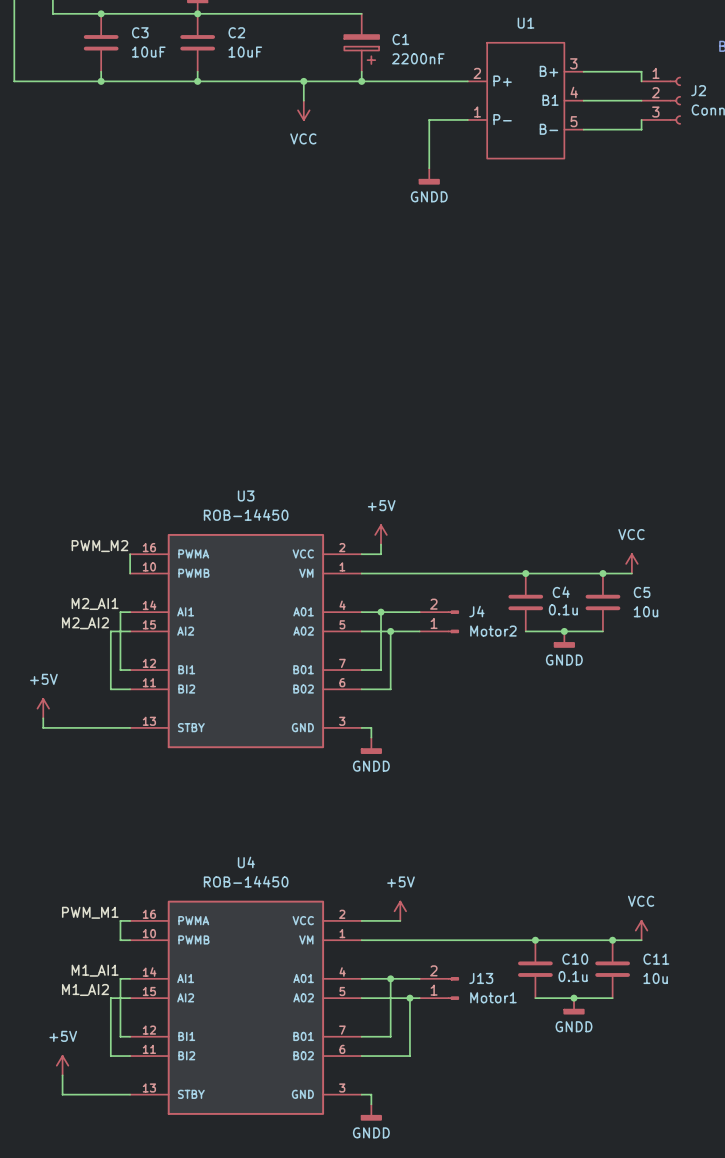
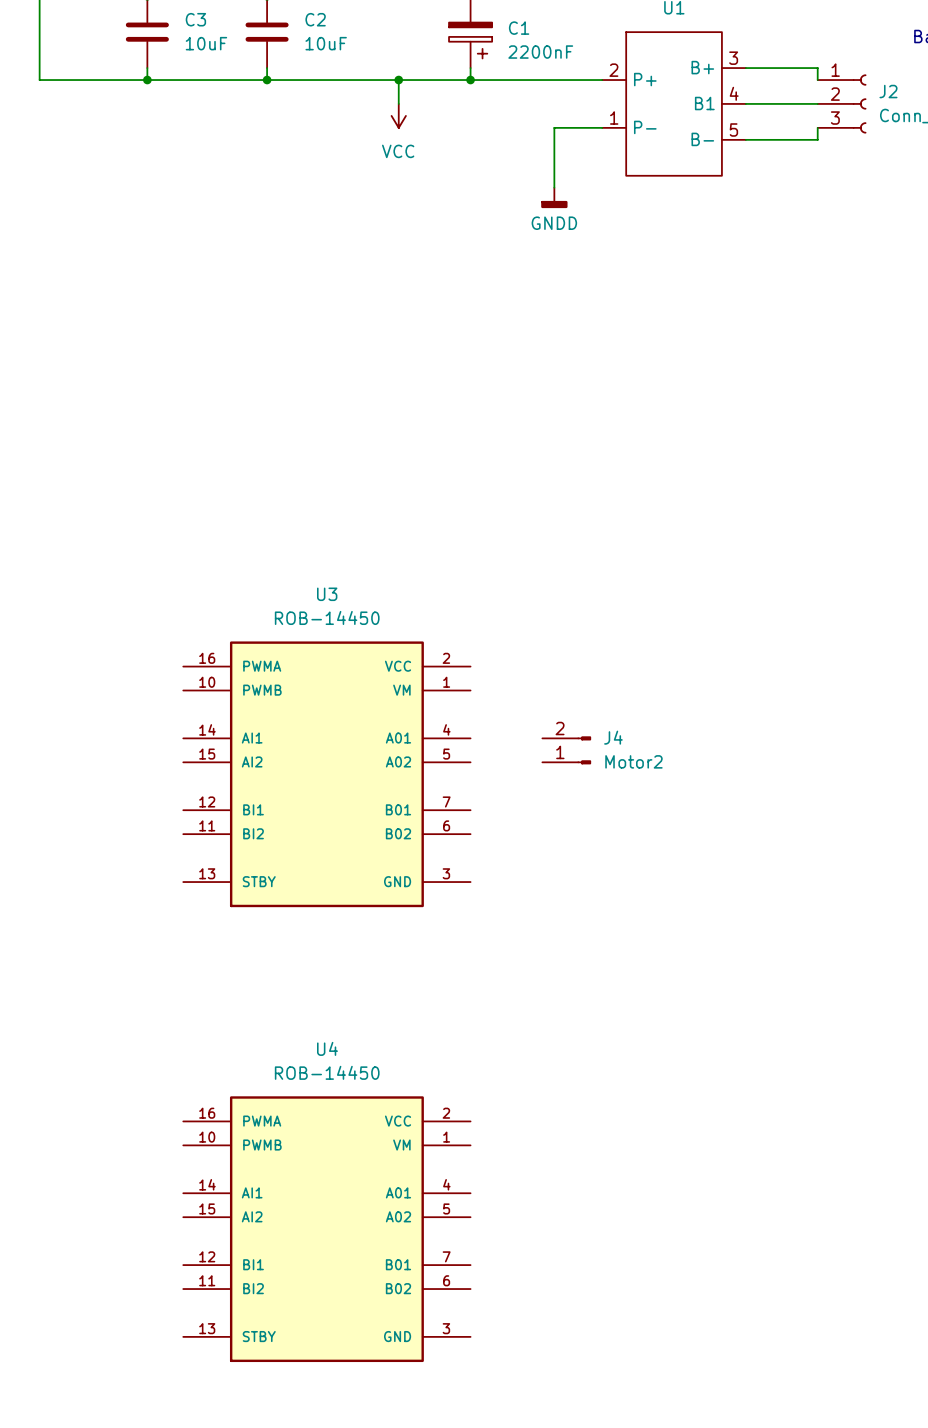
power symbol: +5V (381, 534) -> none
wire: (381, 544) (381, 554) (361, 554) -> none
label: PWM_M2 (99, 546) -> none
wire: (130, 554) (130, 573) -> none
power symbol: VCC (631, 563) -> none
wire: (361, 573) (631, 573) -> none
junction: (525, 573) -> none
junction: (602, 573) -> none
C4: 0.1u (525, 602) -> none
C5: 10u (602, 602) -> none
label: M2_AI1 (95, 603) -> none
wire: (130, 612) (120, 612) (120, 670) (130, 670) -> none
wire: (361, 612) (419, 612) -> none
wire: (381, 612) (381, 670) (361, 670) -> none
junction: (381, 612) -> none
label: M2_AI2 (85, 623) -> none
wire: (130, 631) (110, 631) (110, 689) (130, 689) -> none
wire: (361, 631) (419, 631) -> none
wire: (390, 631) (390, 689) (361, 689) -> none
junction: (390, 631) -> none
wire: (525, 631) (602, 631) -> none
junction: (564, 631) -> none
power symbol: GNDD (564, 639) -> none
power symbol: +5V (43, 708) -> none
wire: (43, 718) (43, 727) (130, 727) -> none
wire: (361, 727) (371, 727) (371, 737) -> none
power symbol: GNDD (371, 745) -> none
power symbol: +5V (400, 911) -> none
label: PWM_M1 (90, 912) -> none
wire: (130, 920) (120, 920) (120, 940) (130, 940) -> none
wire: (361, 920) (400, 920) -> none
power symbol: VCC (641, 930) -> none
wire: (361, 940) (641, 940) -> none
junction: (535, 940) -> none
junction: (612, 940) -> none
C10: 0.1u (535, 969) -> none
C11: 10u (612, 969) -> none
label: M1_AI1 (95, 970) -> none
wire: (130, 978) (120, 978) (120, 1036) (130, 1036) -> none
wire: (361, 978) (419, 978) -> none
wire: (390, 978) (390, 1036) (361, 1036) -> none
junction: (390, 978) -> none
J13: Motor1 (439, 988) -> none
label: M1_AI2 (85, 989) -> none
wire: (130, 998) (110, 998) (110, 1056) (130, 1056) -> none
wire: (361, 998) (419, 998) -> none
wire: (409, 998) (409, 1056) (361, 1056) -> none
junction: (409, 998) -> none
wire: (535, 998) (612, 998) -> none
junction: (574, 998) -> none
power symbol: GNDD (574, 1006) -> none
power symbol: +5V (62, 1065) -> none
wire: (62, 1075) (62, 1094) (130, 1094) -> none
wire: (361, 1094) (371, 1094) (371, 1104) -> none
power symbol: GNDD (371, 1112) -> none

